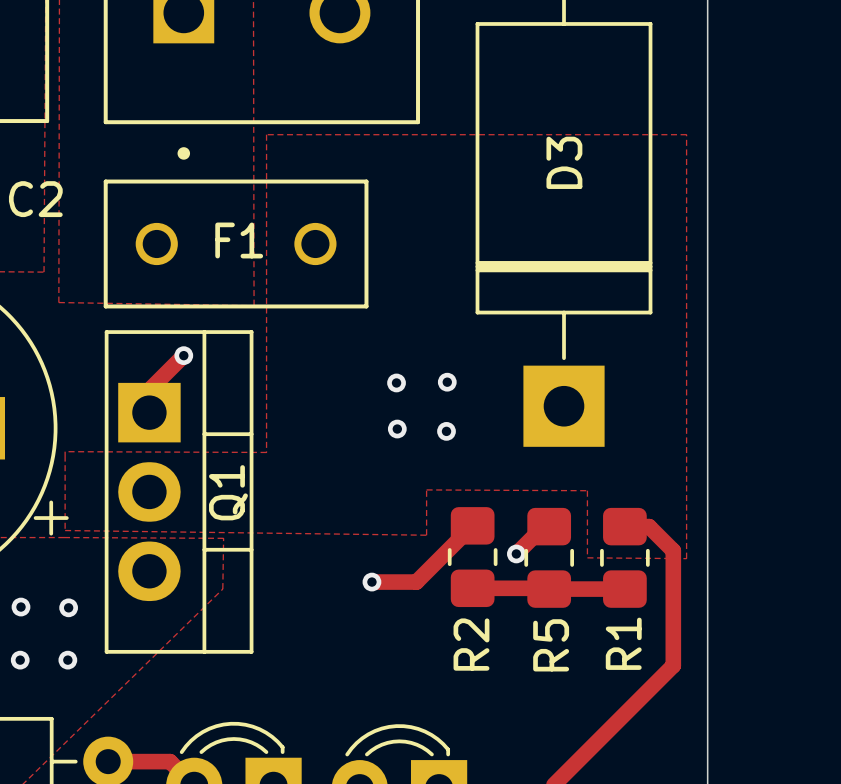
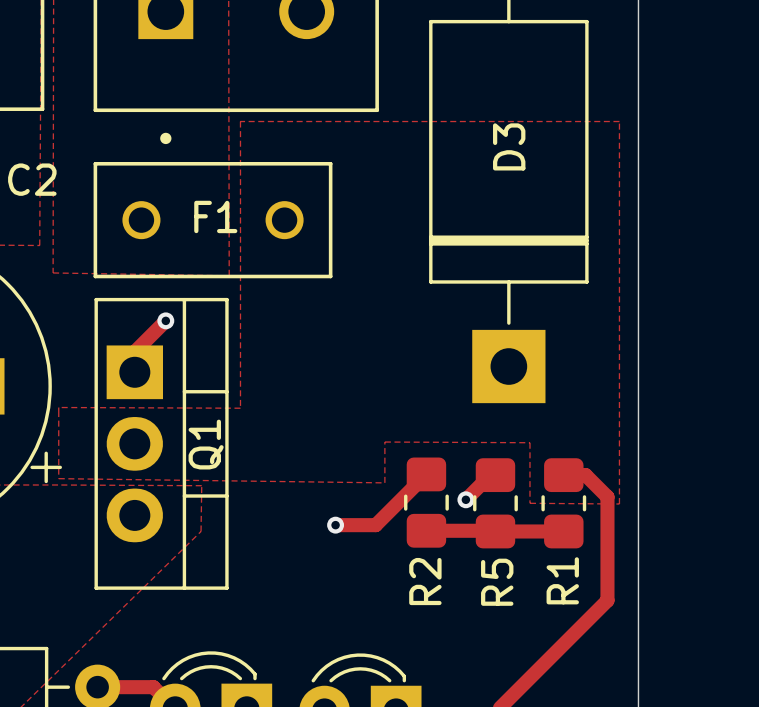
via: (396, 382) -> none
via: (447, 382) -> none
via: (397, 429) -> none
via: (446, 431) -> none
via: (21, 607) -> none
via: (68, 607) -> none
via: (20, 660) -> none
via: (67, 660) -> none

